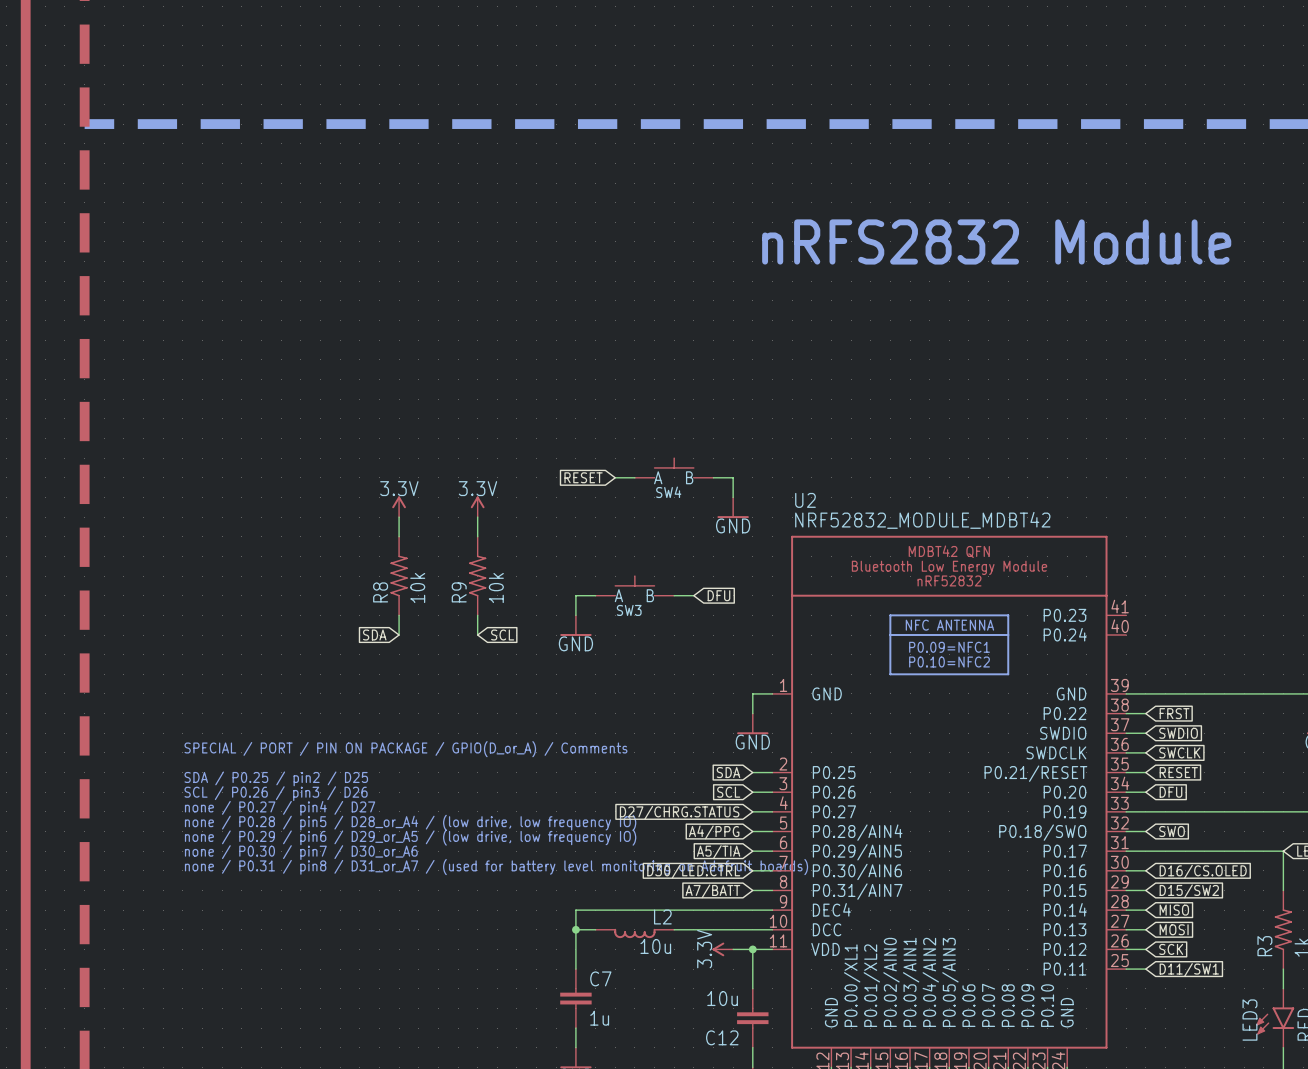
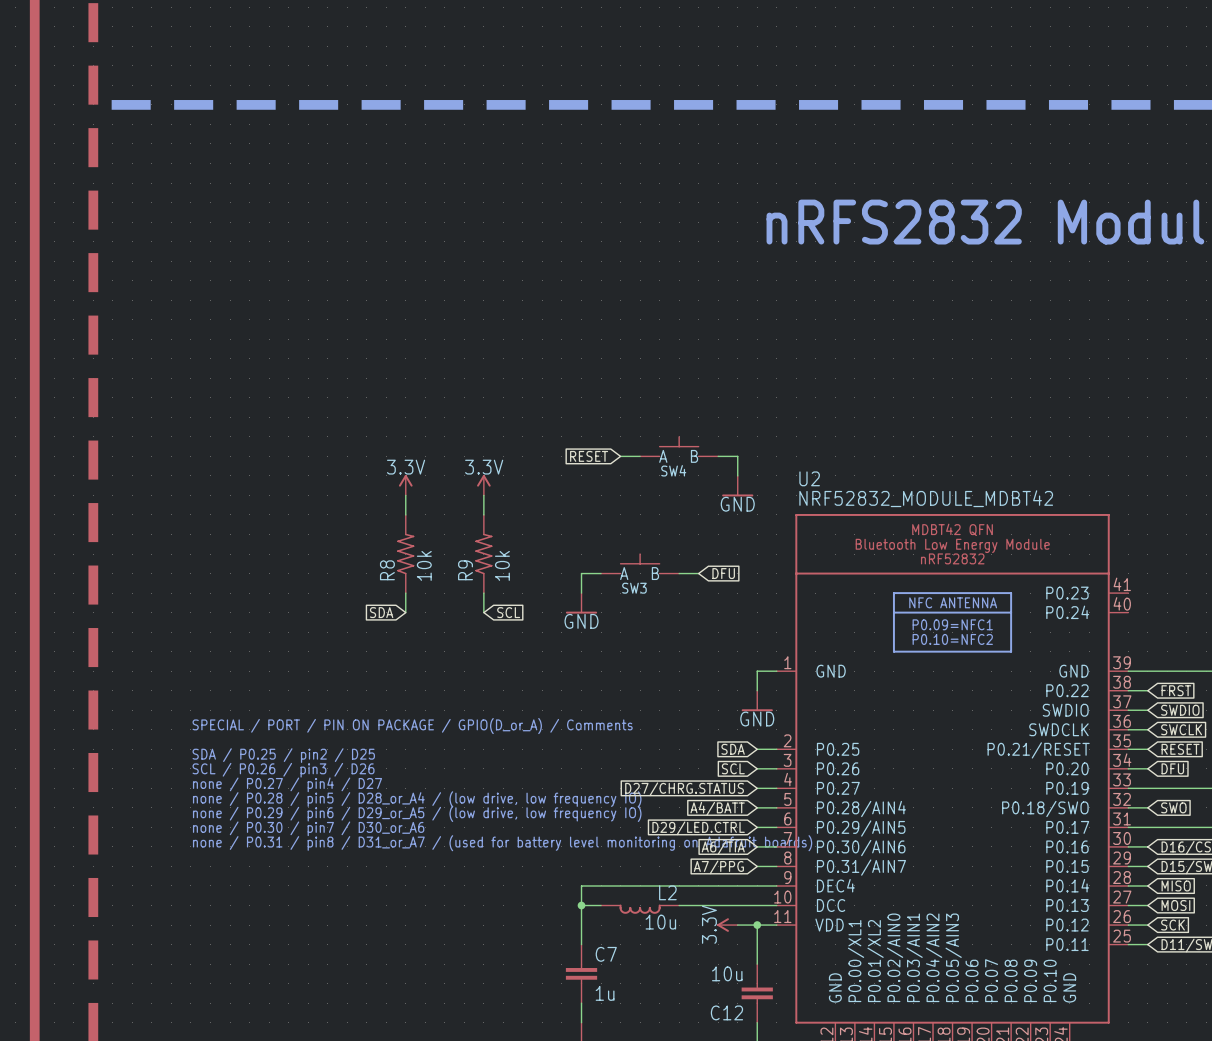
global label: A4/PPG (714, 832) -> A4/BATT (717, 808)
global label: A5/TIA (718, 852) -> D29/LED.CTRL (698, 828)
global label: D30/LED.CTRL (693, 871) -> A6/TIA (723, 847)
global label: A7/BATT (712, 891) -> A7/PPG (718, 867)

